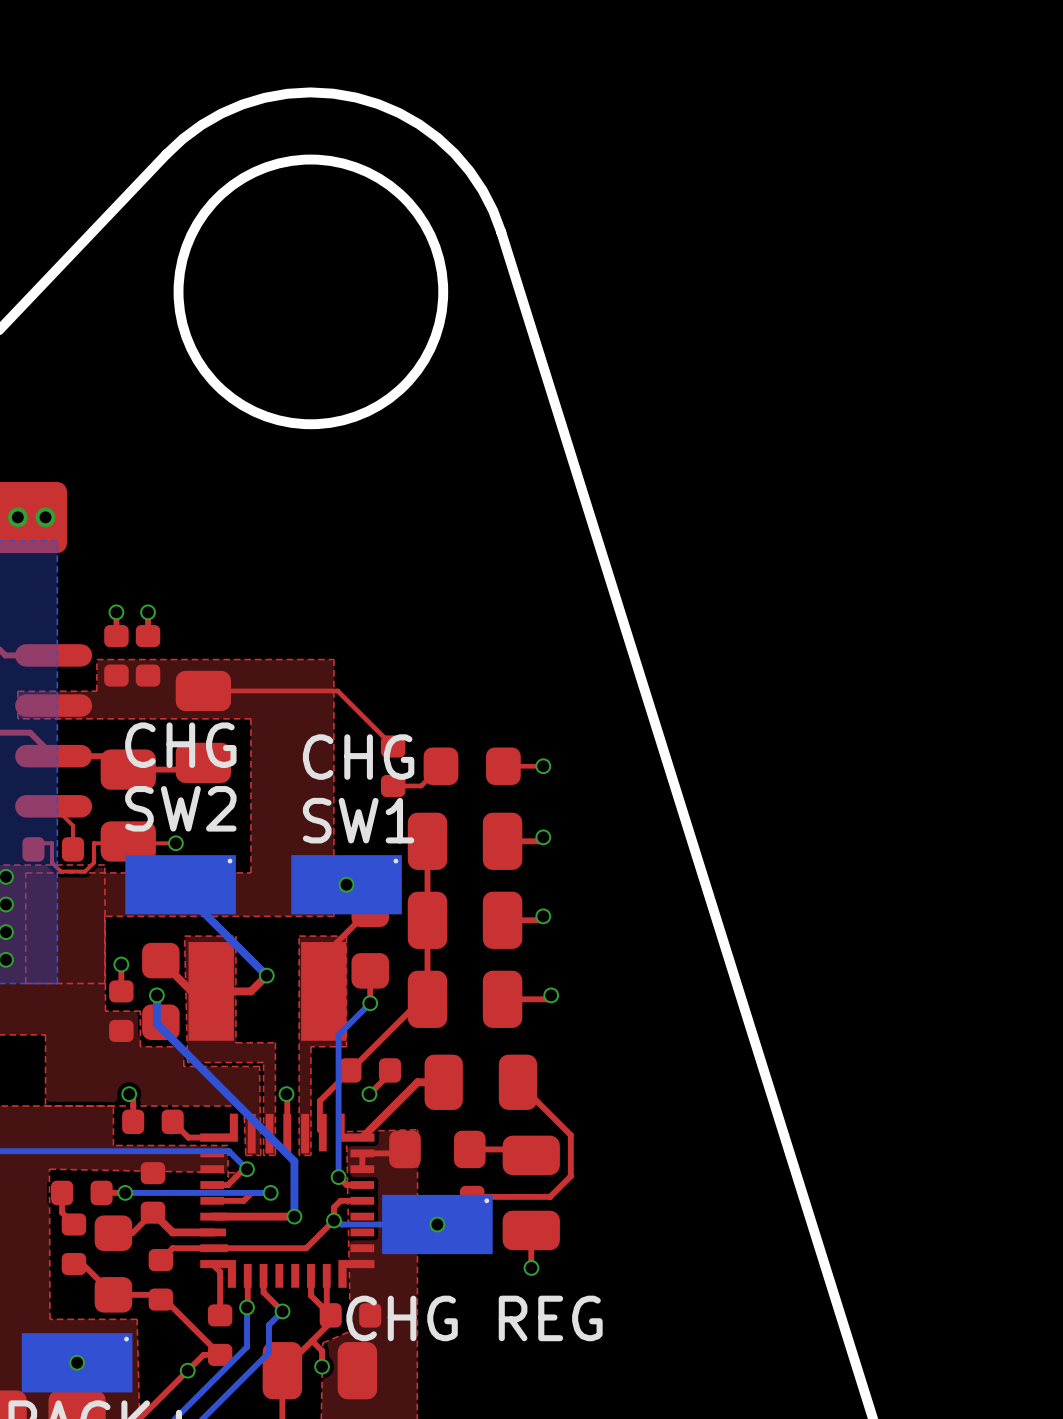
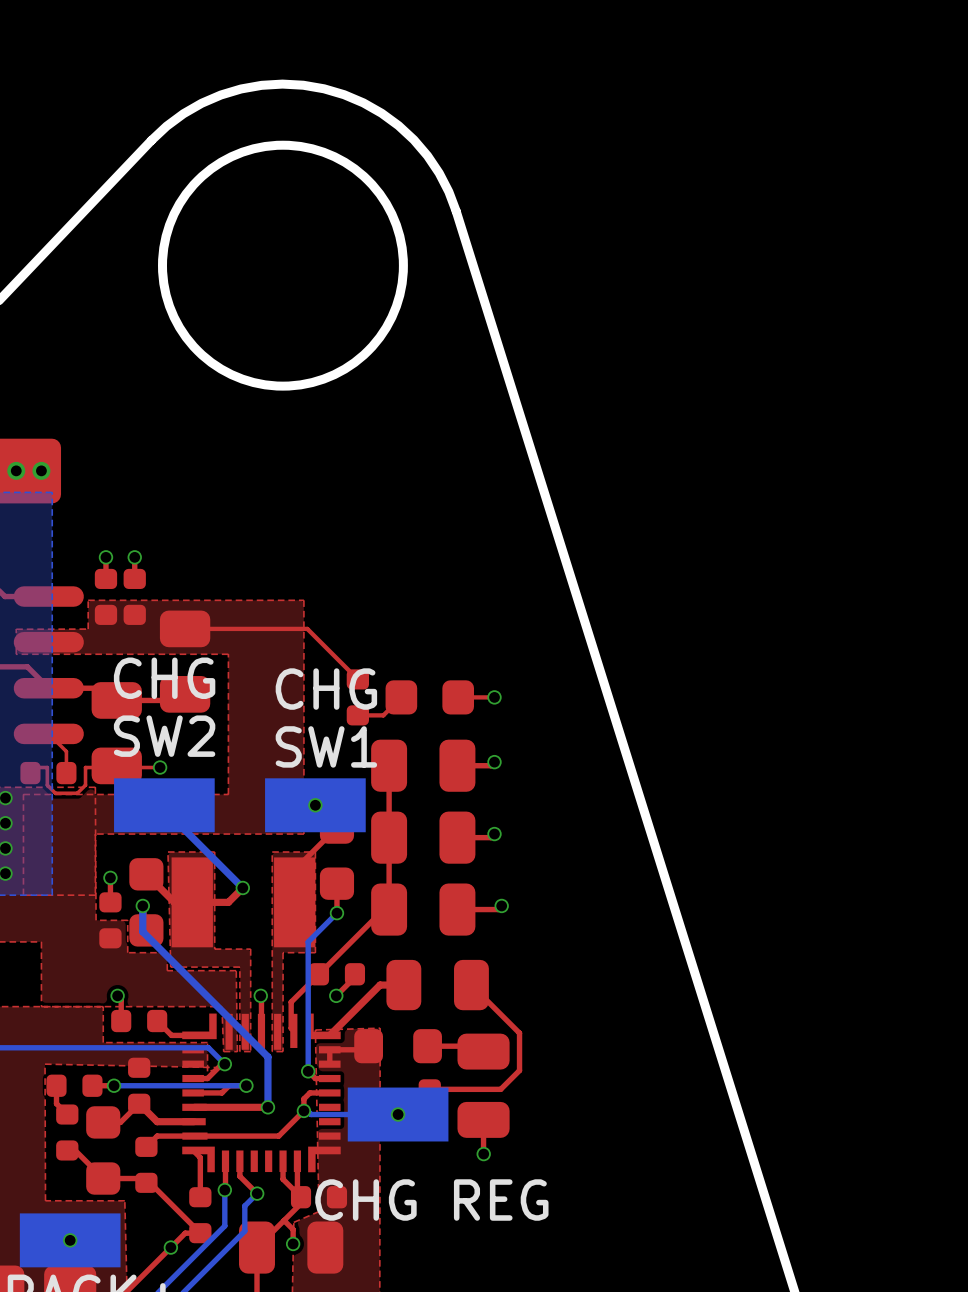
part footprint: [125, 855, 236, 915] -> [114, 778, 215, 833]
part footprint: [291, 855, 402, 915] -> [265, 778, 366, 833]
part footprint: [382, 1194, 493, 1255] -> [347, 1087, 449, 1142]
part footprint: [21, 1333, 133, 1393] -> [19, 1213, 121, 1268]

